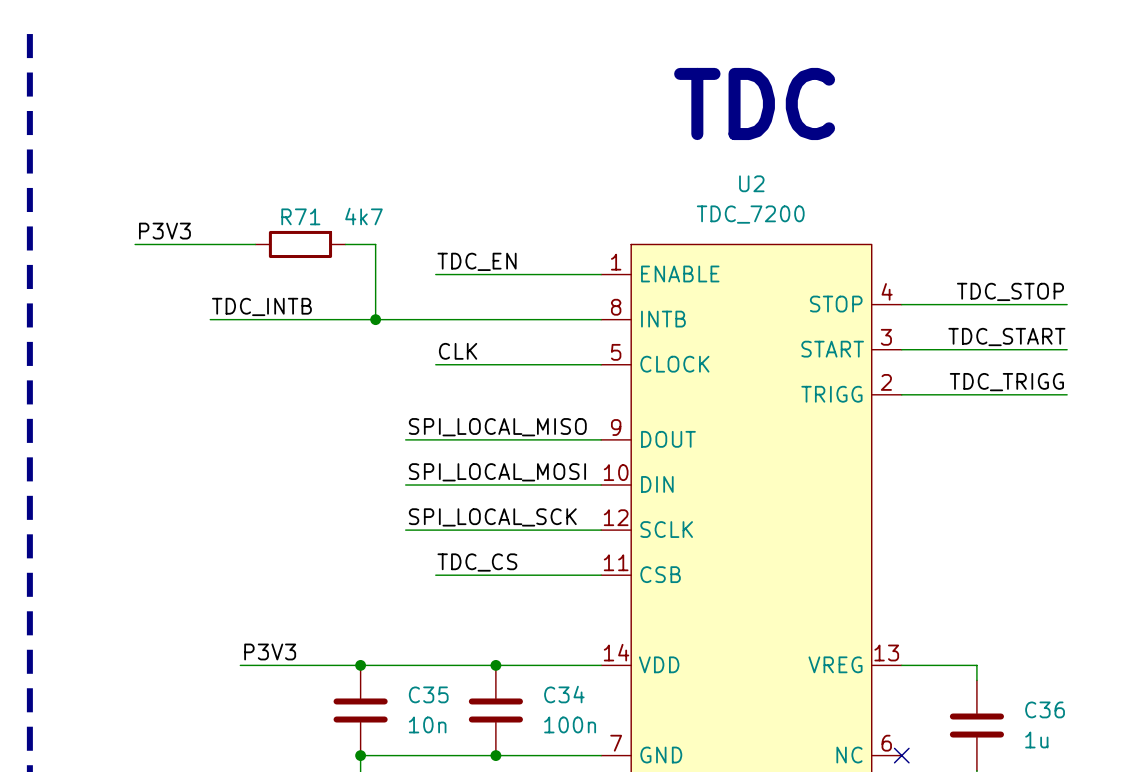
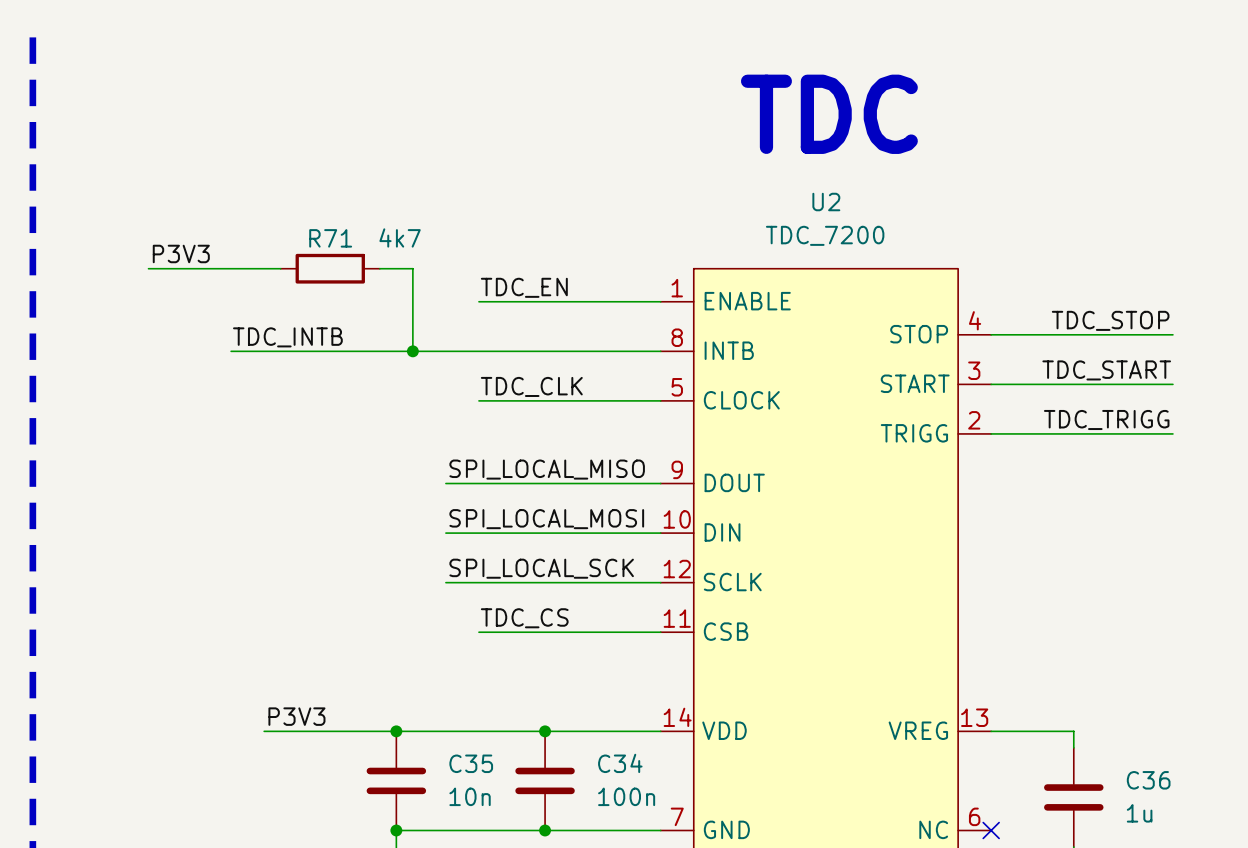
label: CLK (458, 351) -> TDC_CLK (531, 386)

